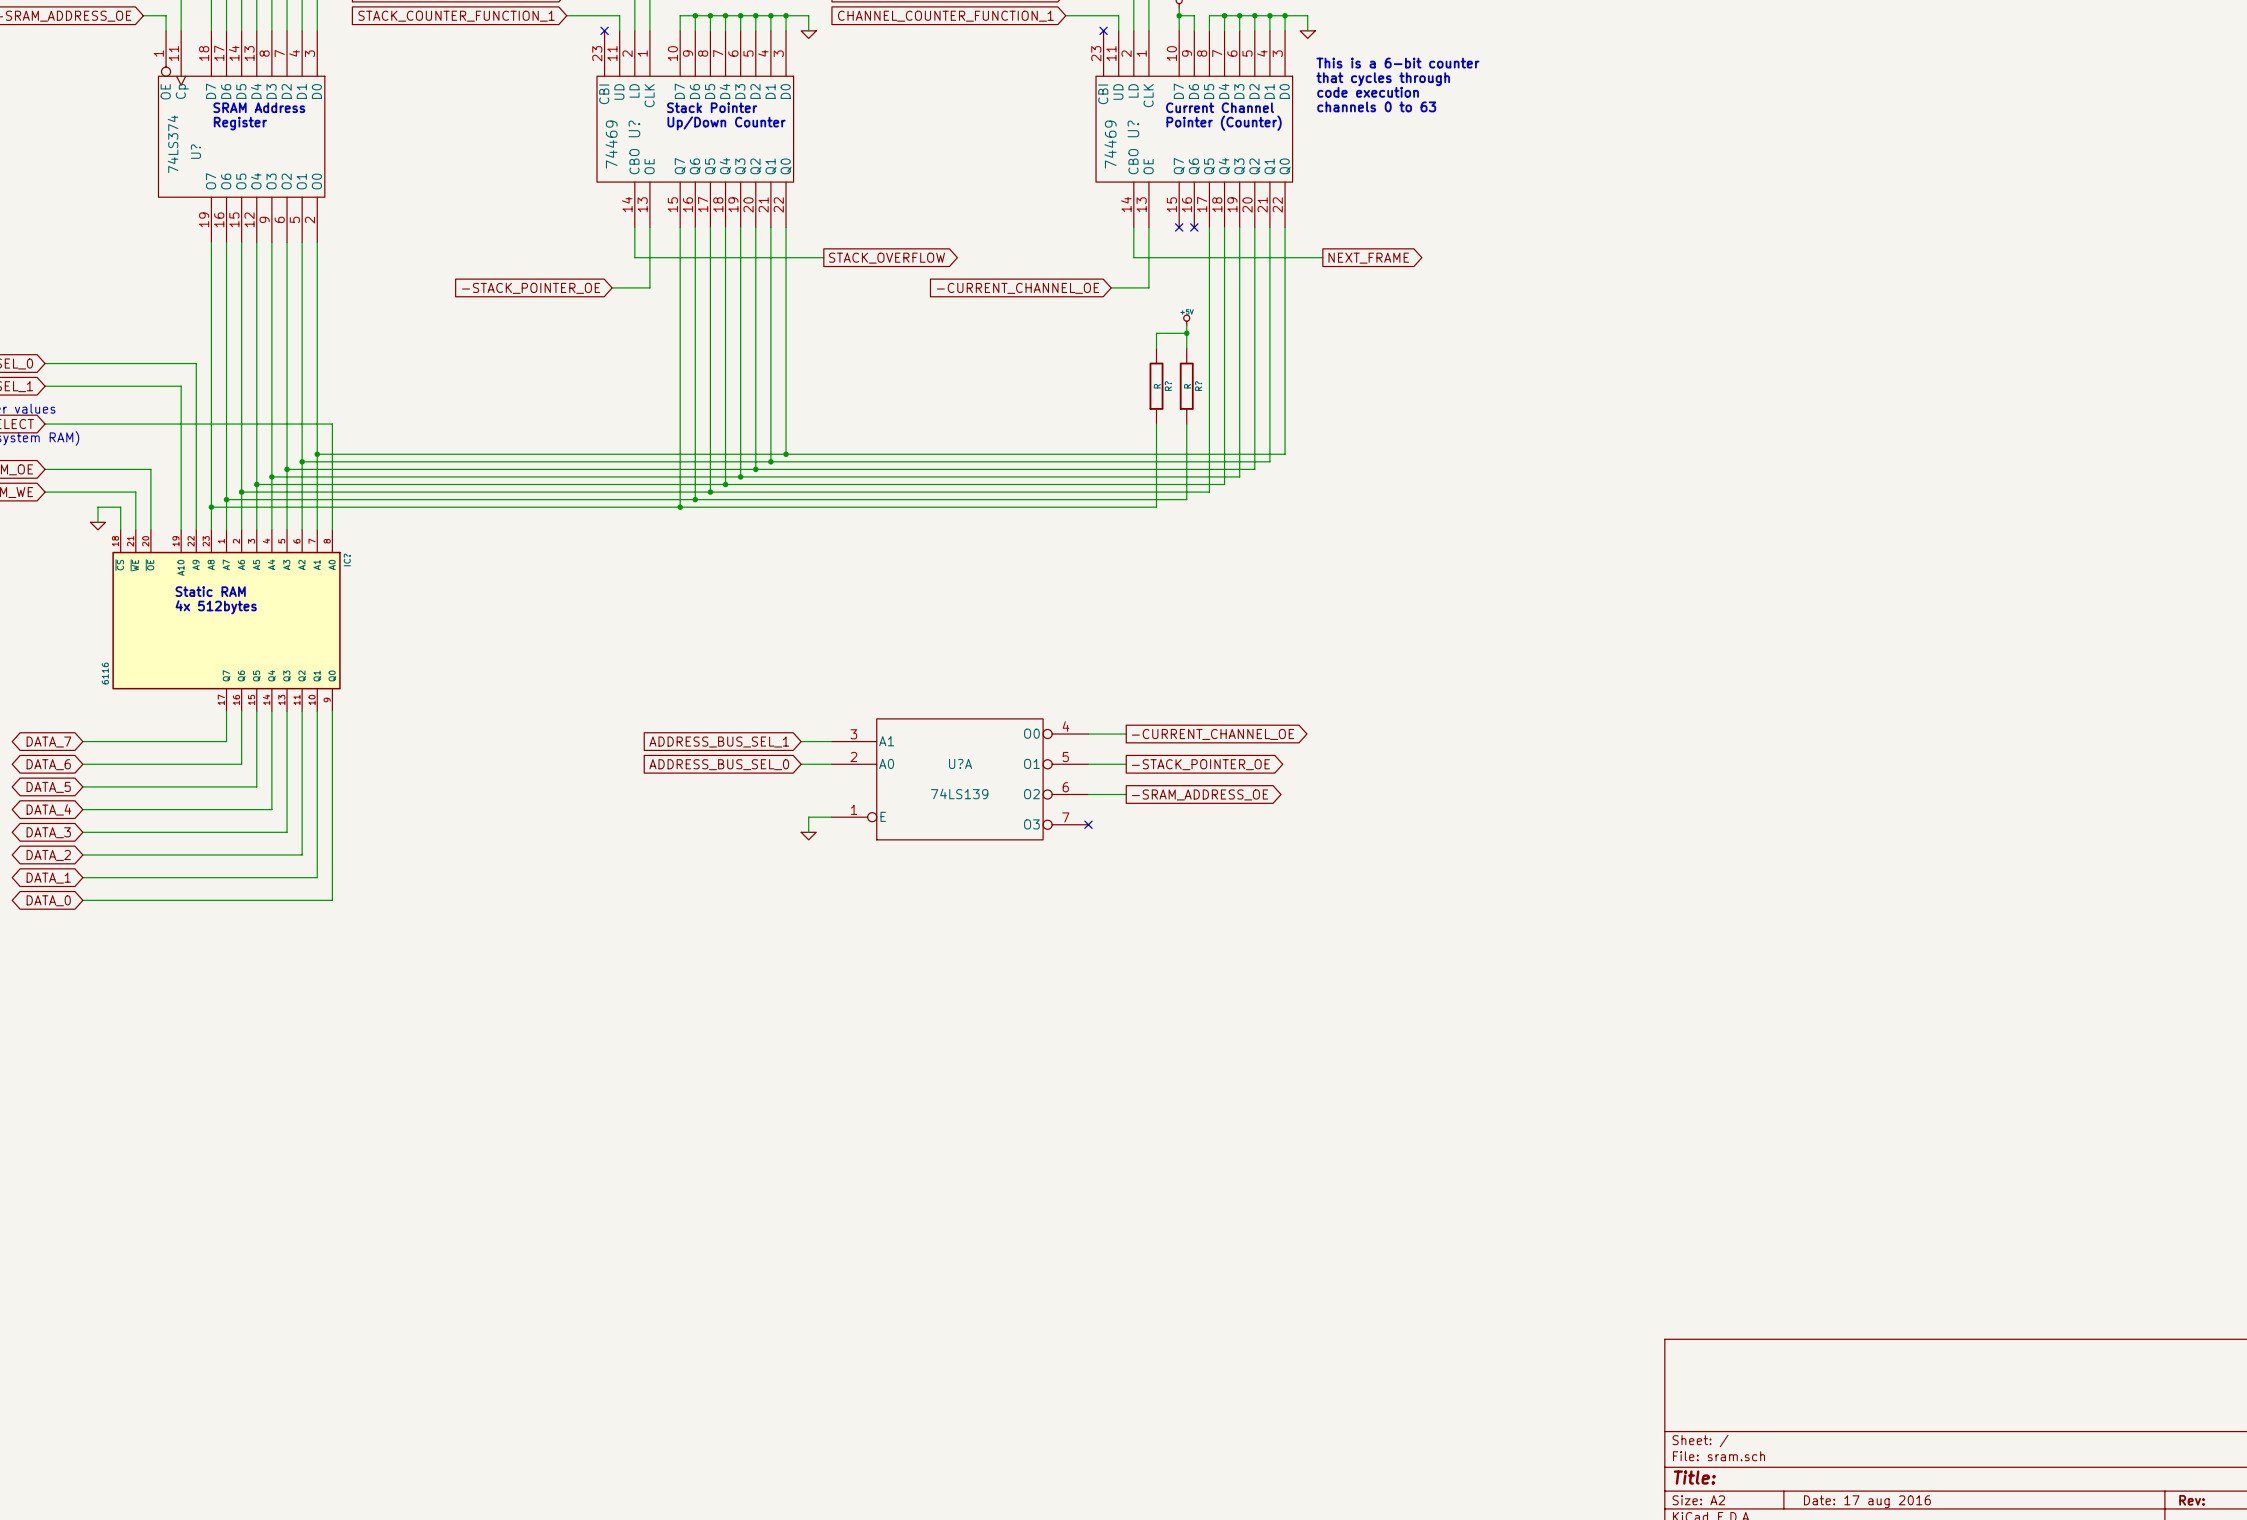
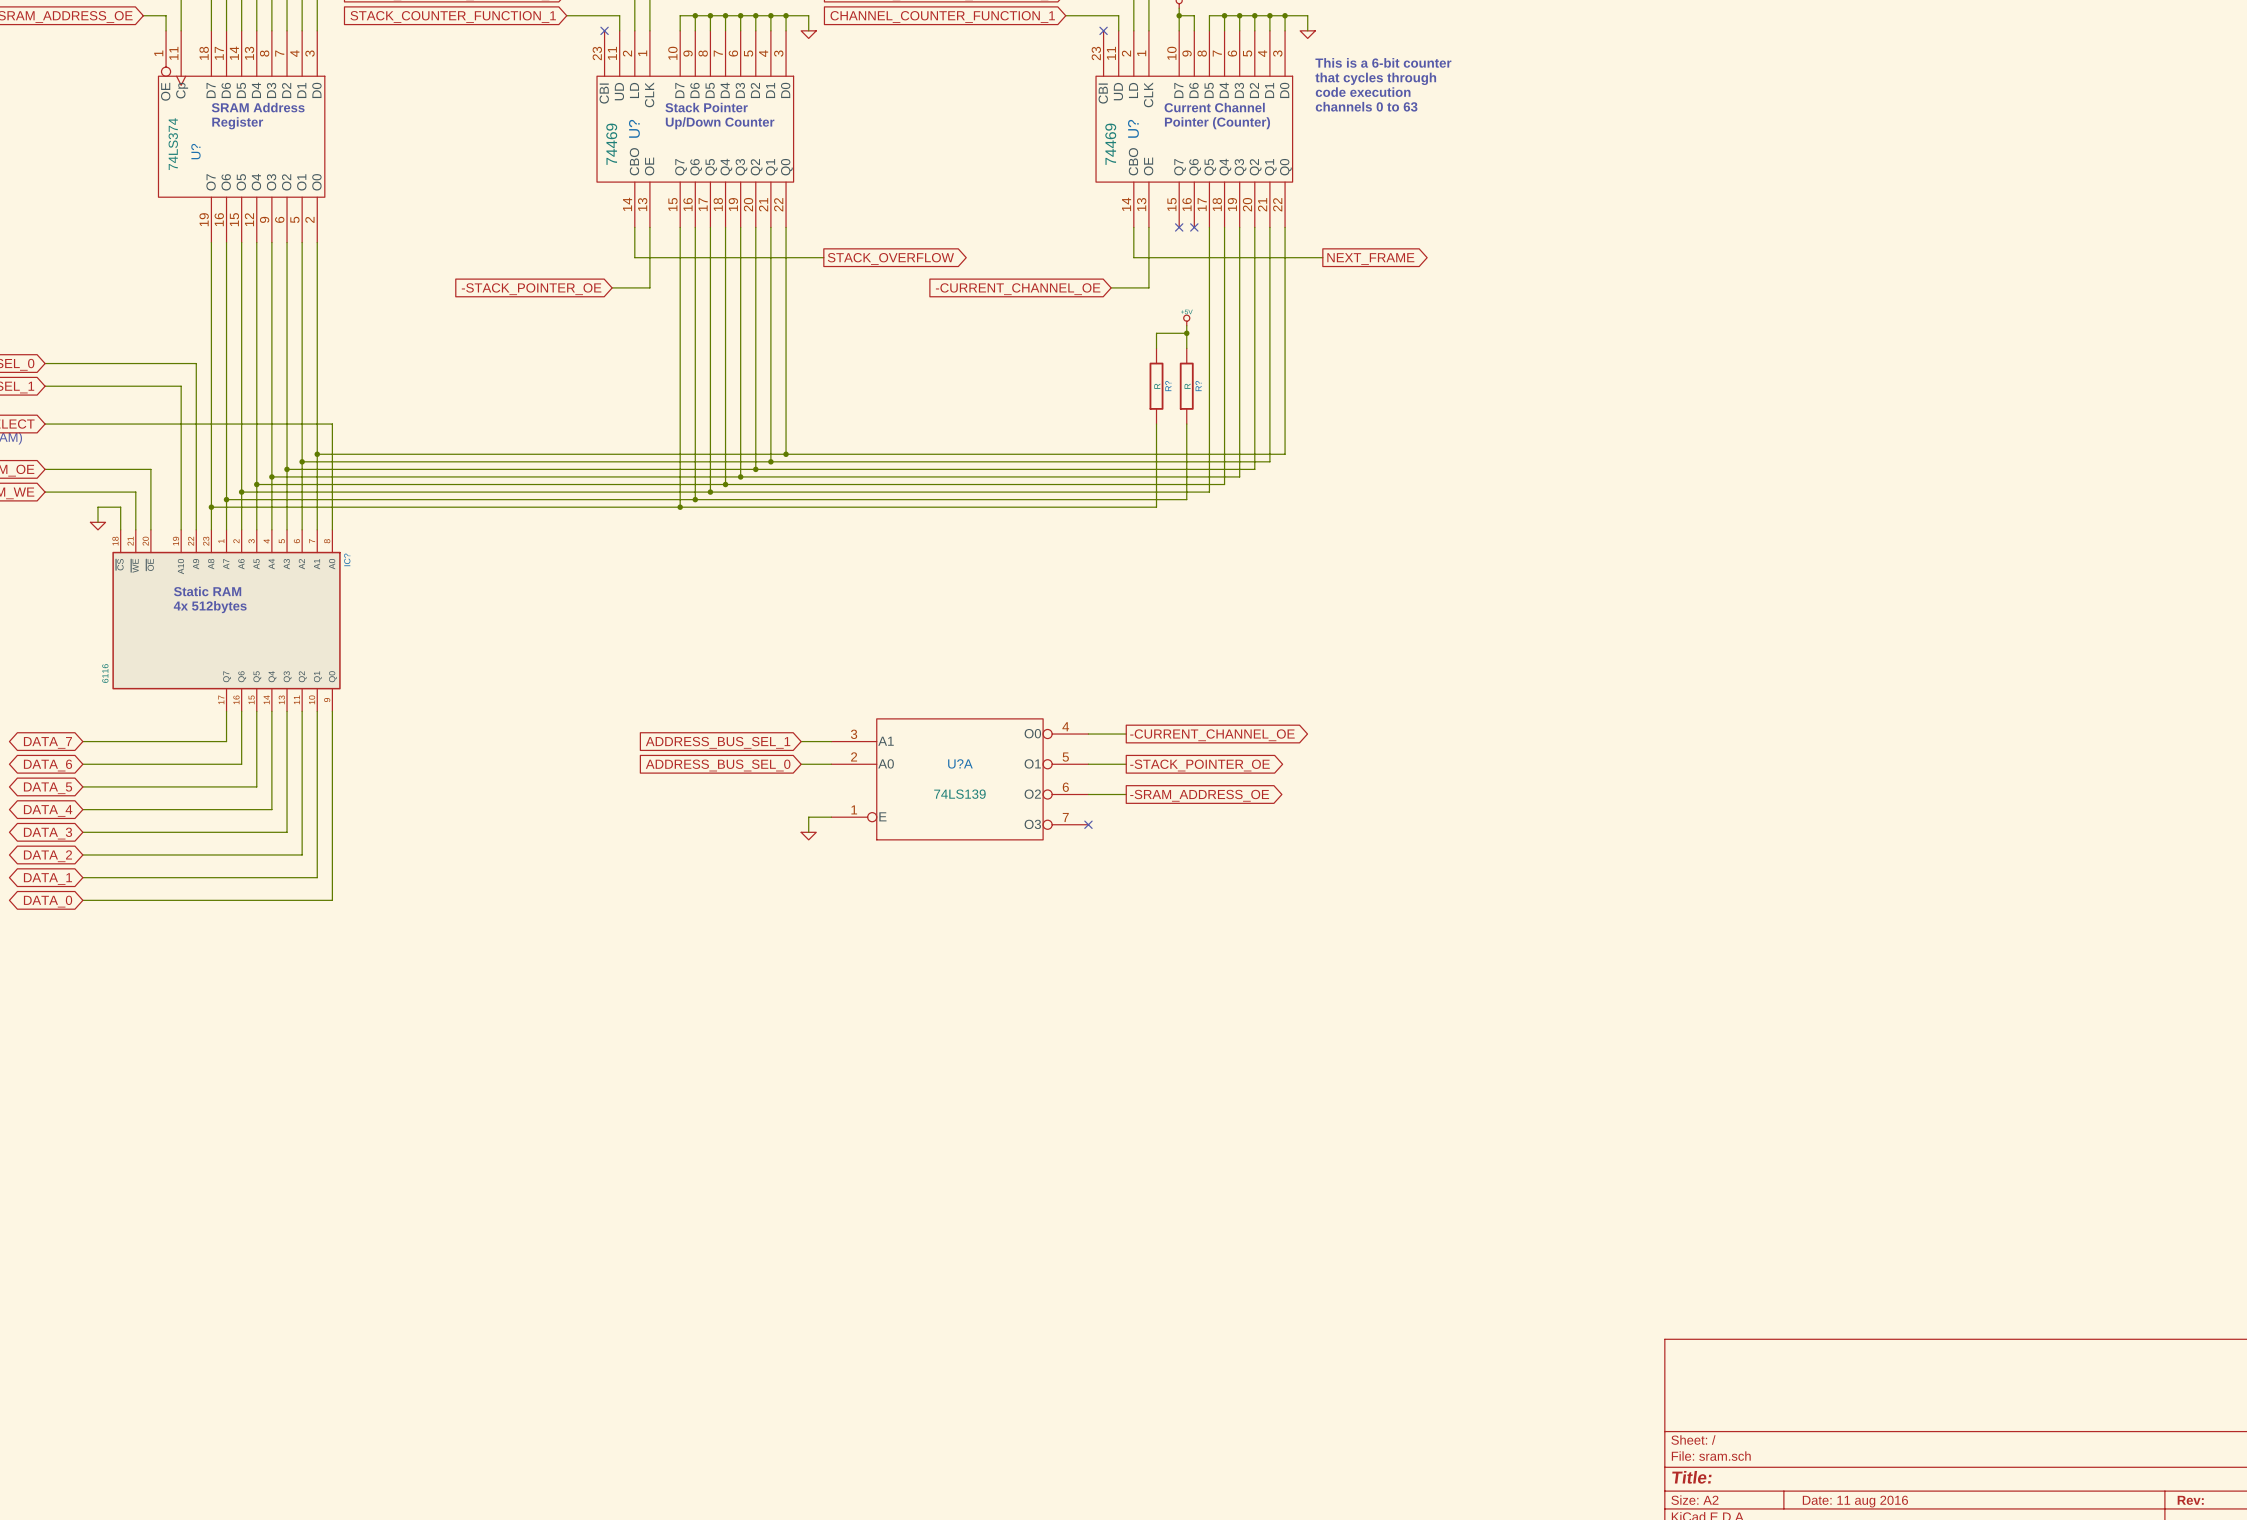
title block: Date: 17 aug 2016 (1867, 1501) -> Date: 11 aug 2016 (1855, 1501)

